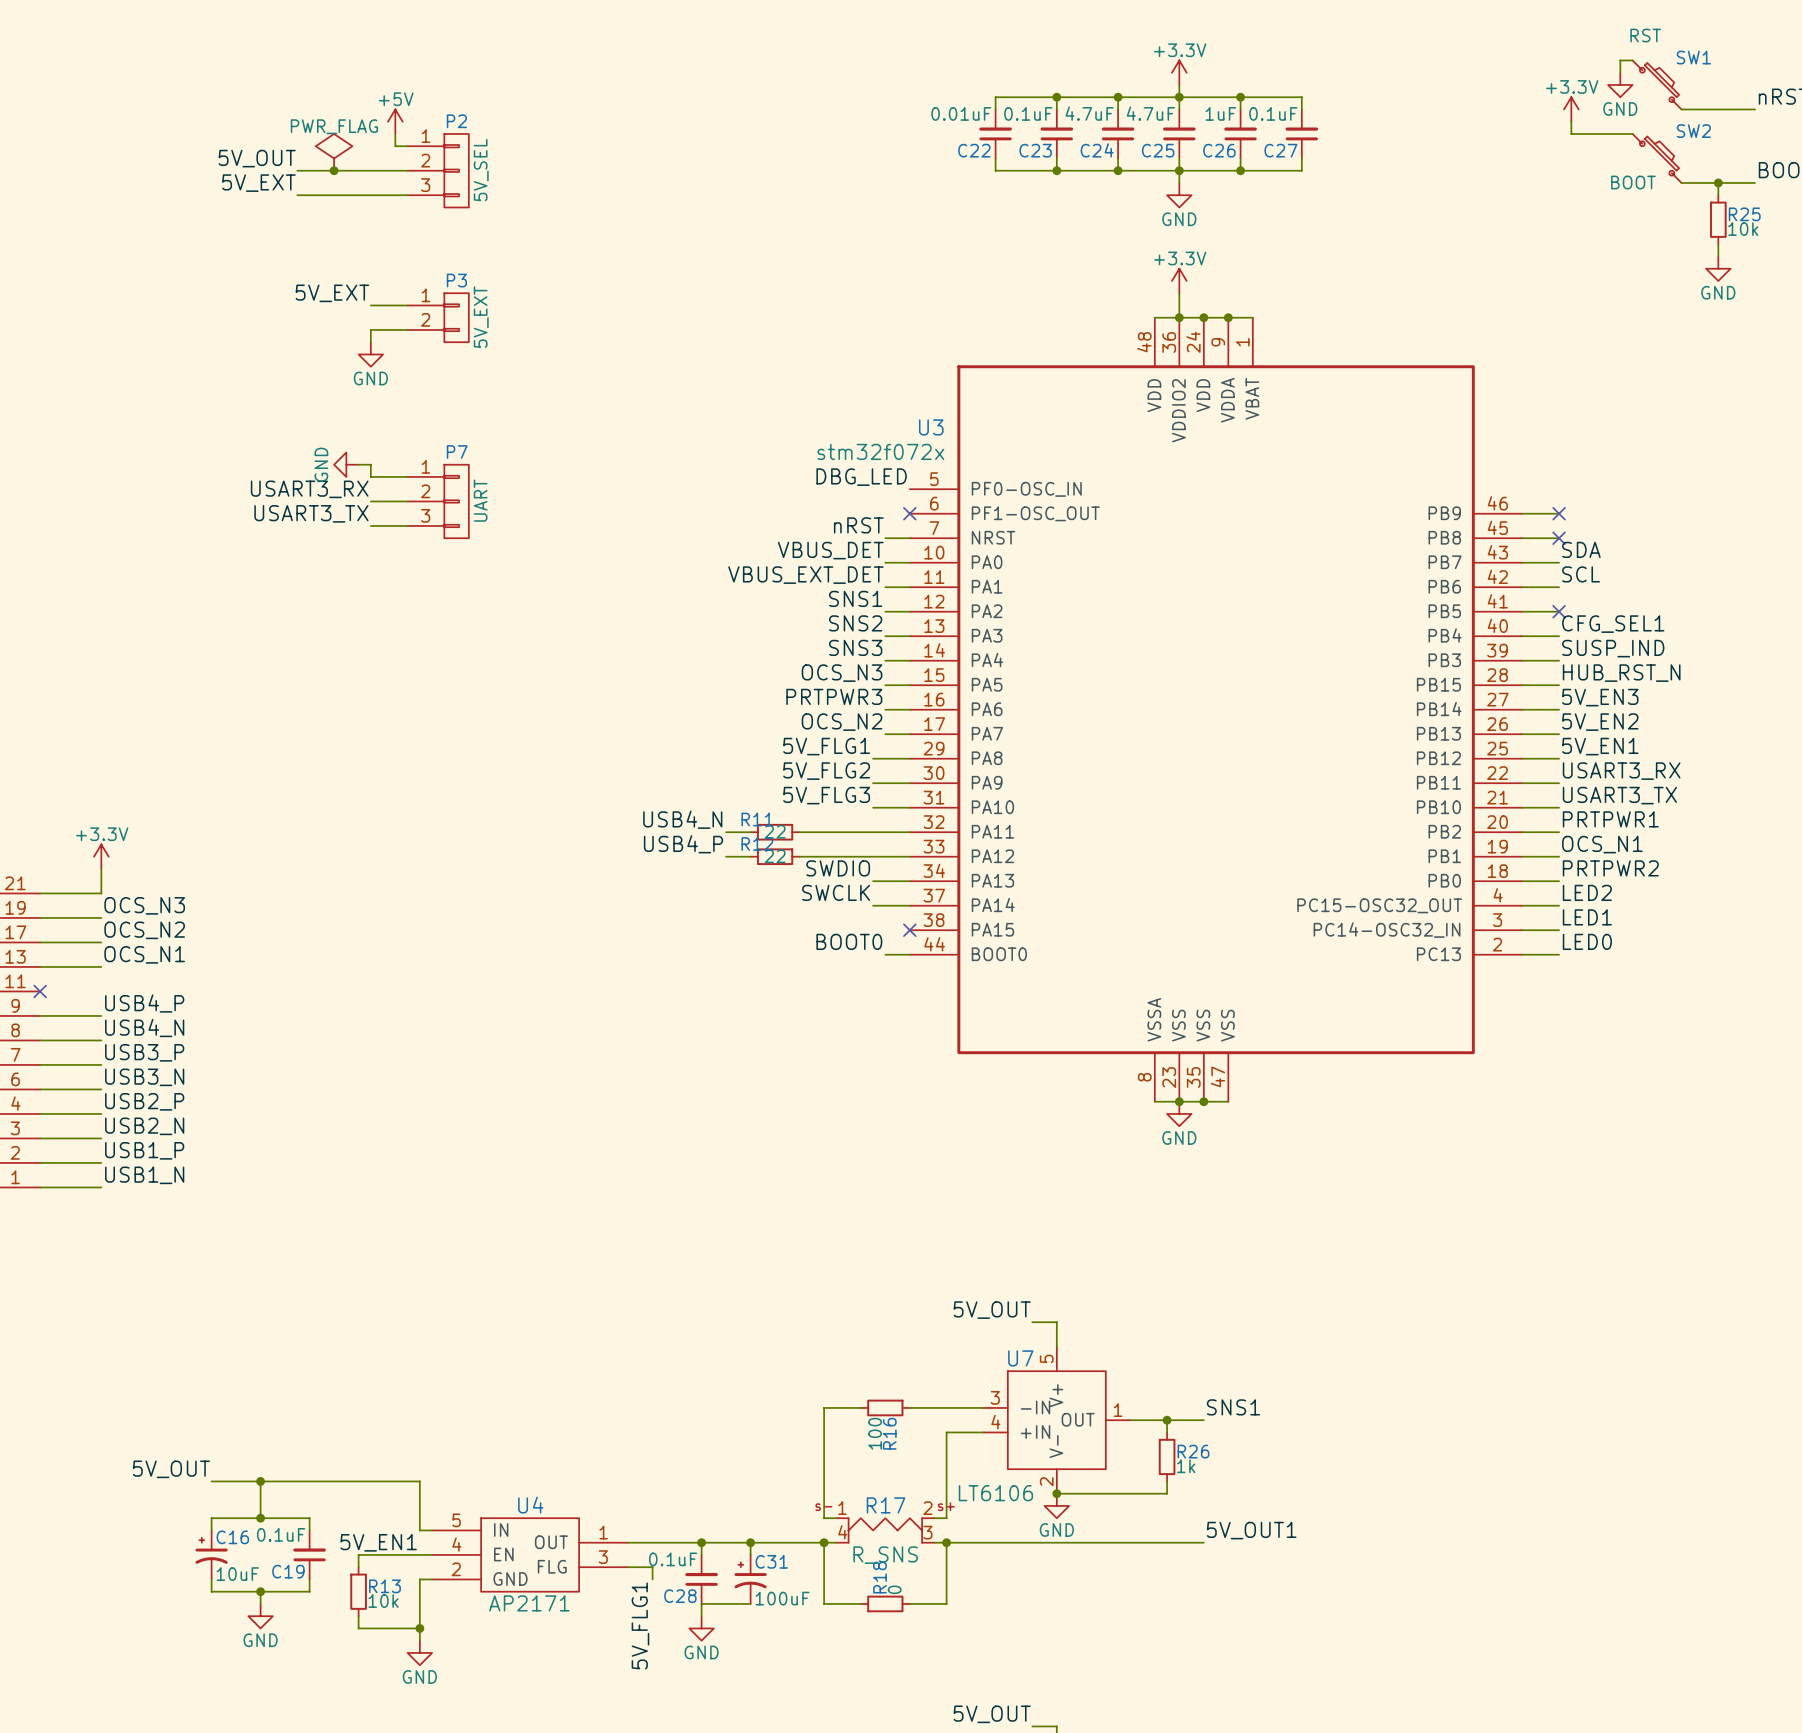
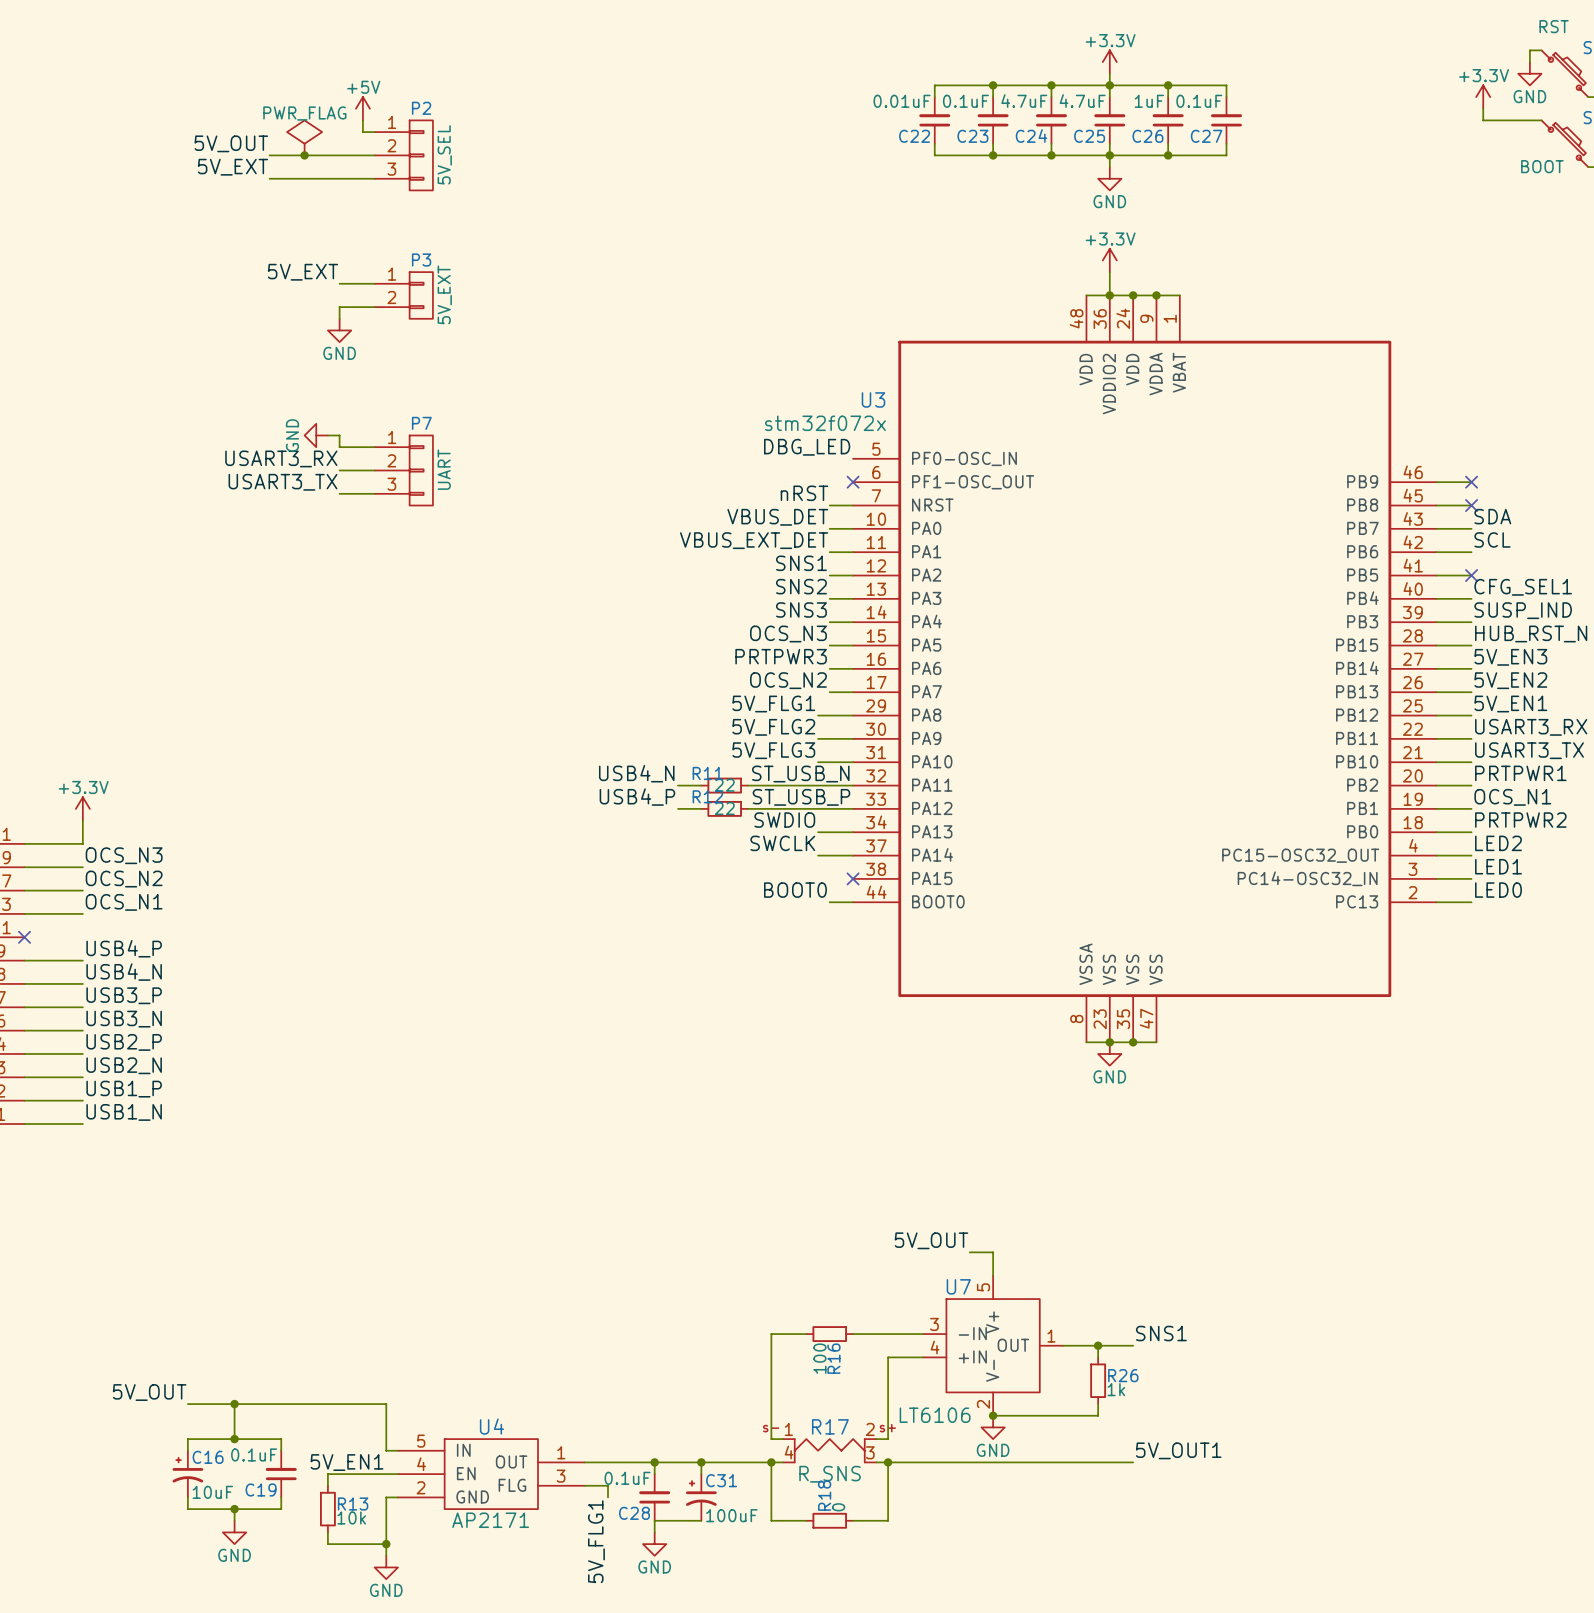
label: none -> ST_USB_N (800, 774)
label: none -> ST_USB_P (801, 797)

